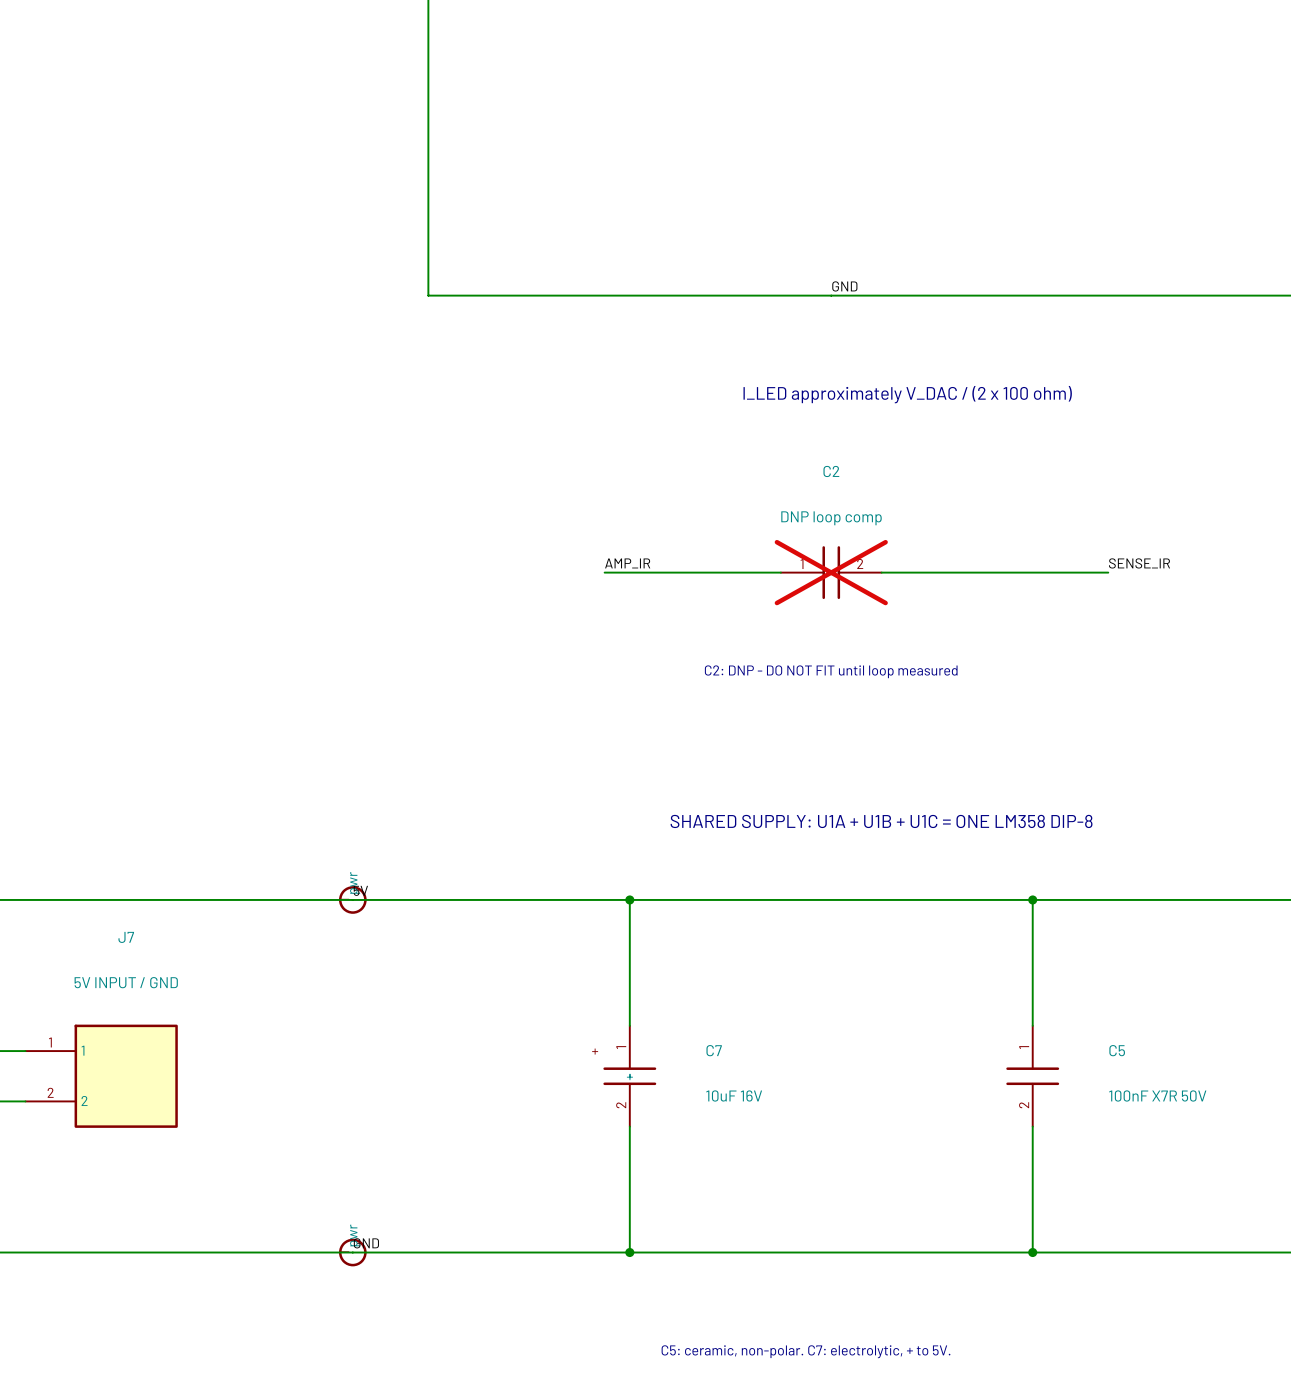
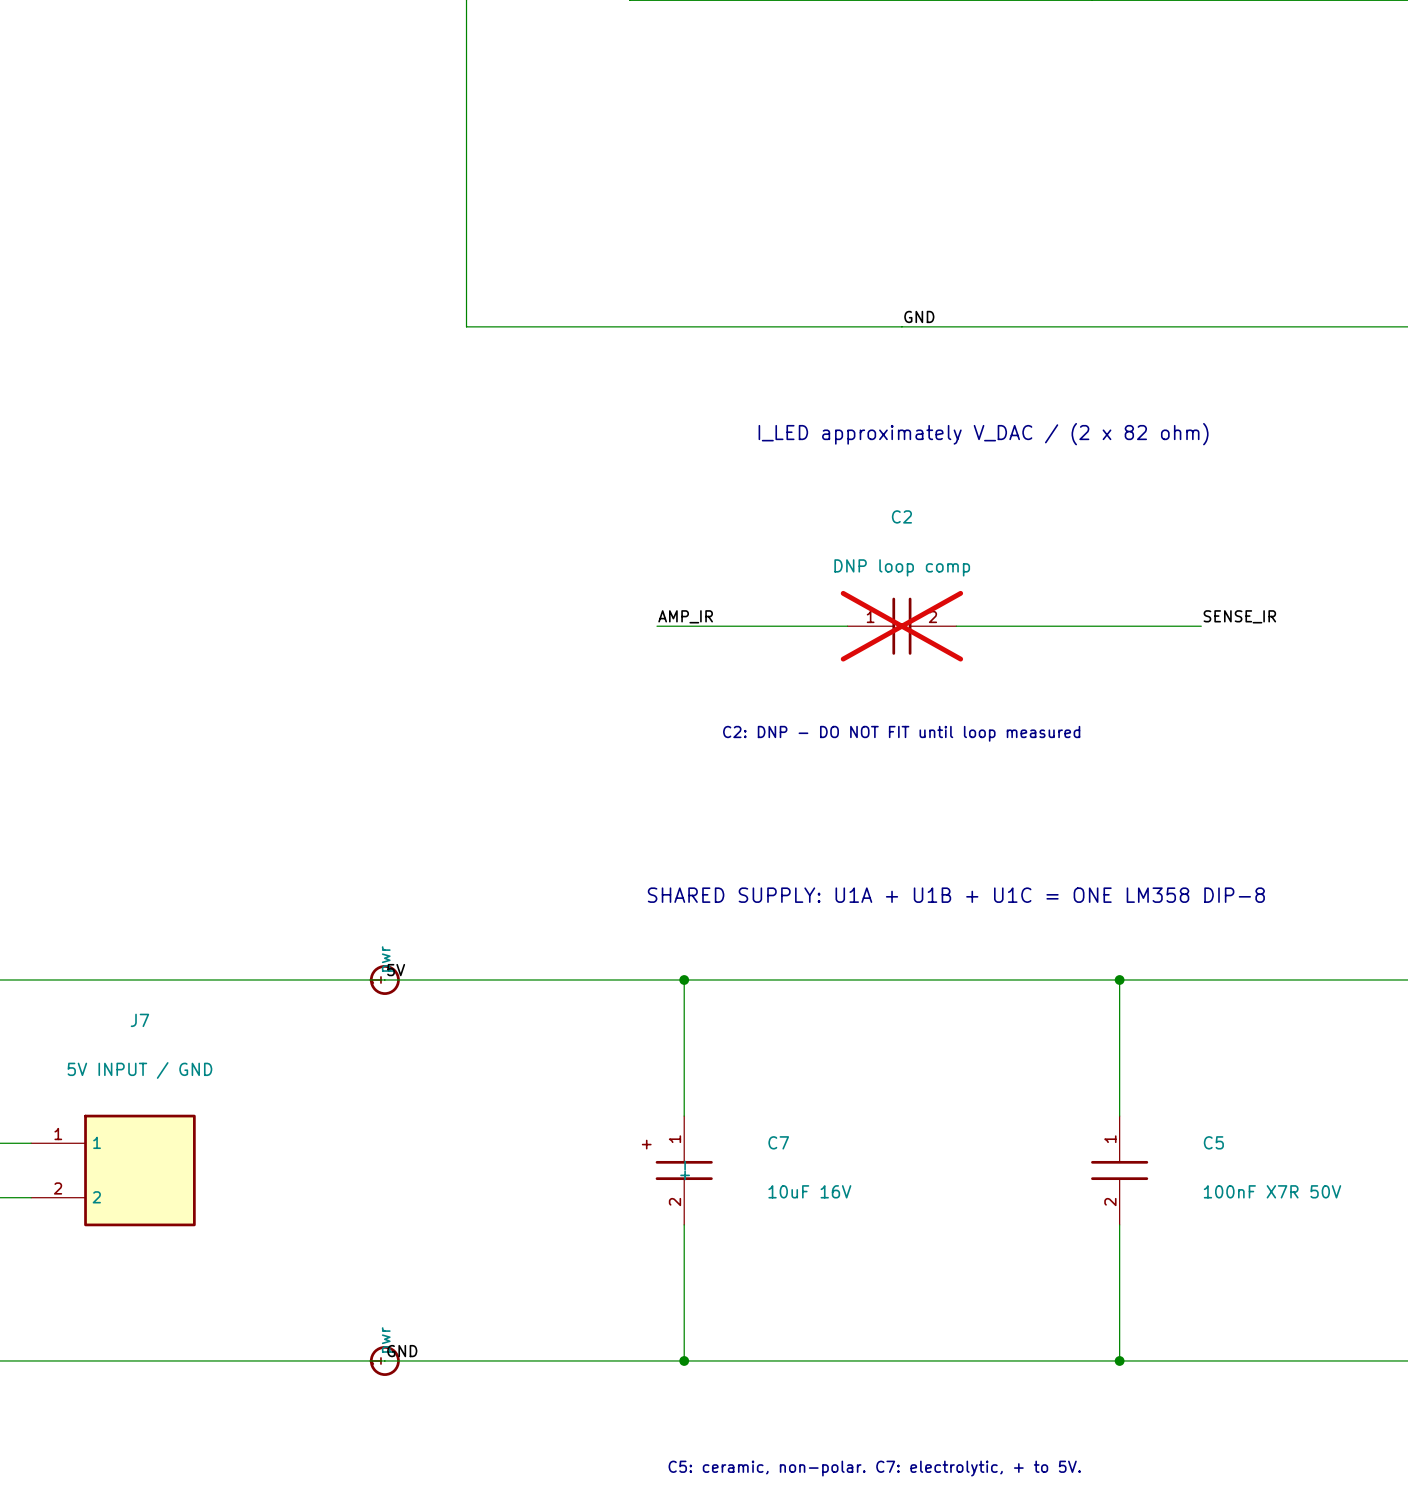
text: I_LED approximately V_DAC / (2 x 100 ohm) (907, 394) -> I_LED approximately V_DAC / (2 x 82 ohm) (983, 434)

